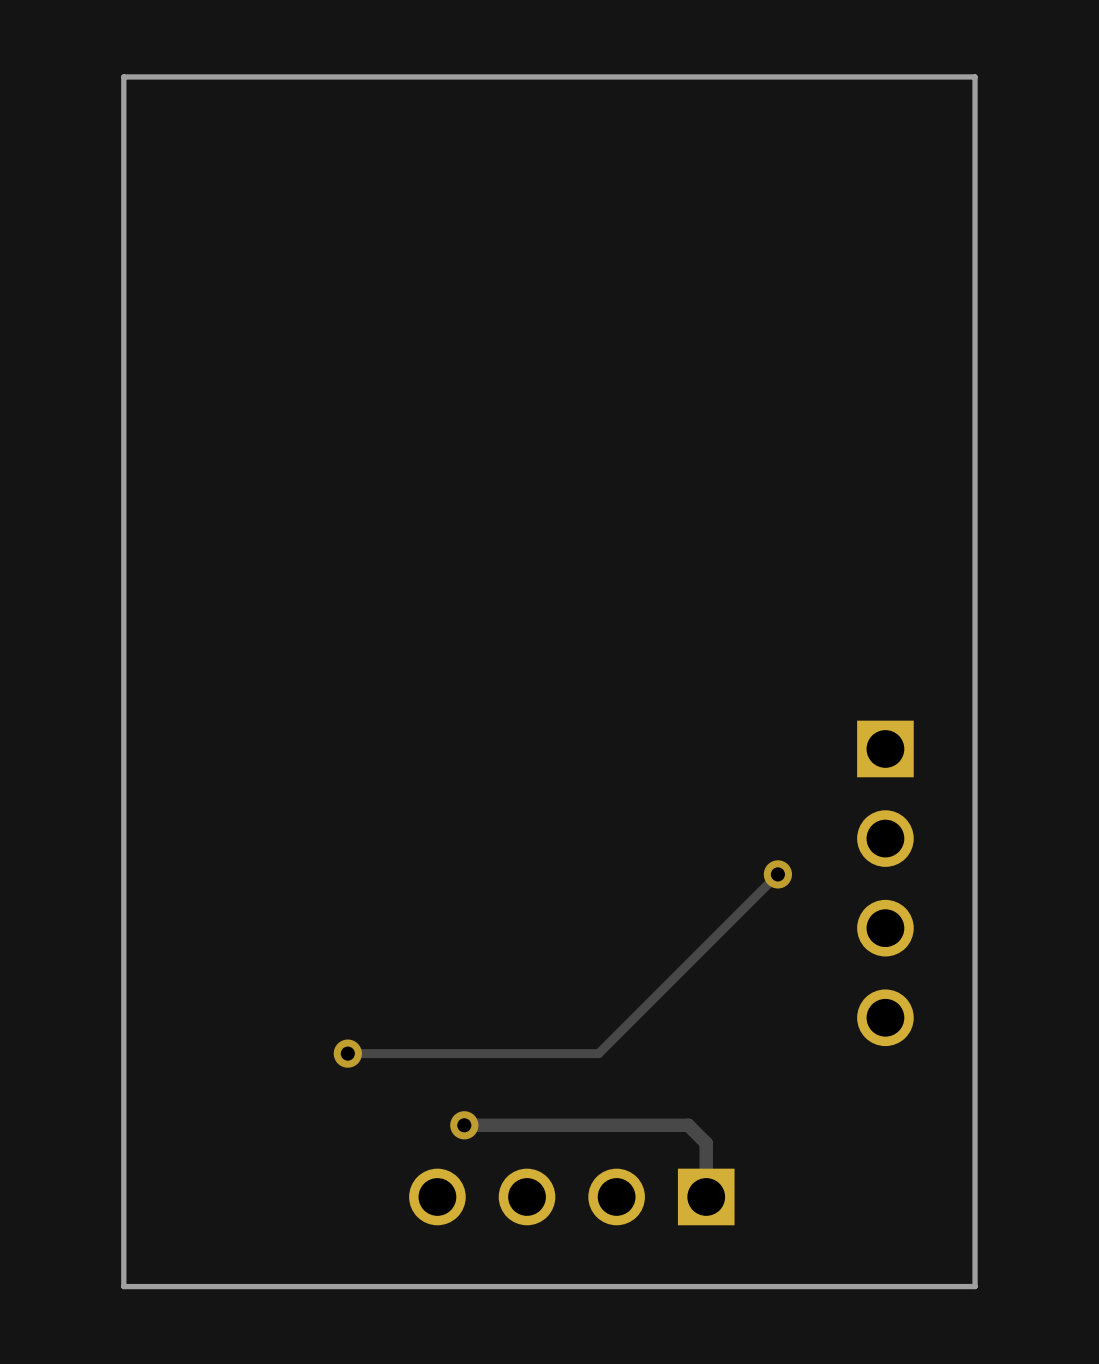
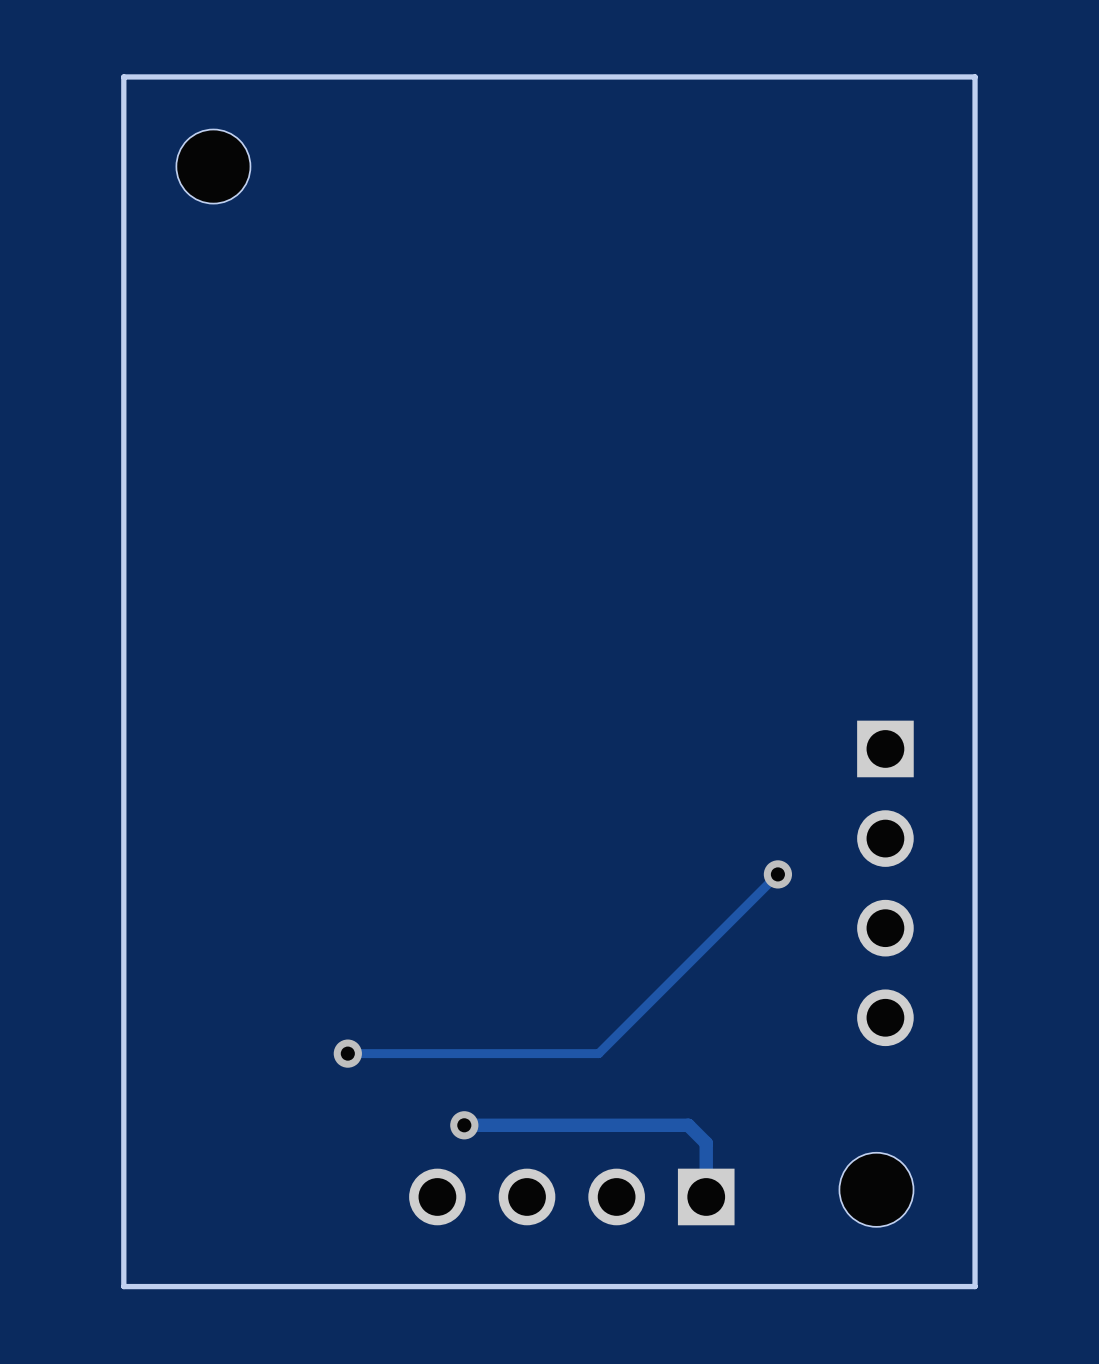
part: none -> (213, 166)
part: none -> (876, 1189)

